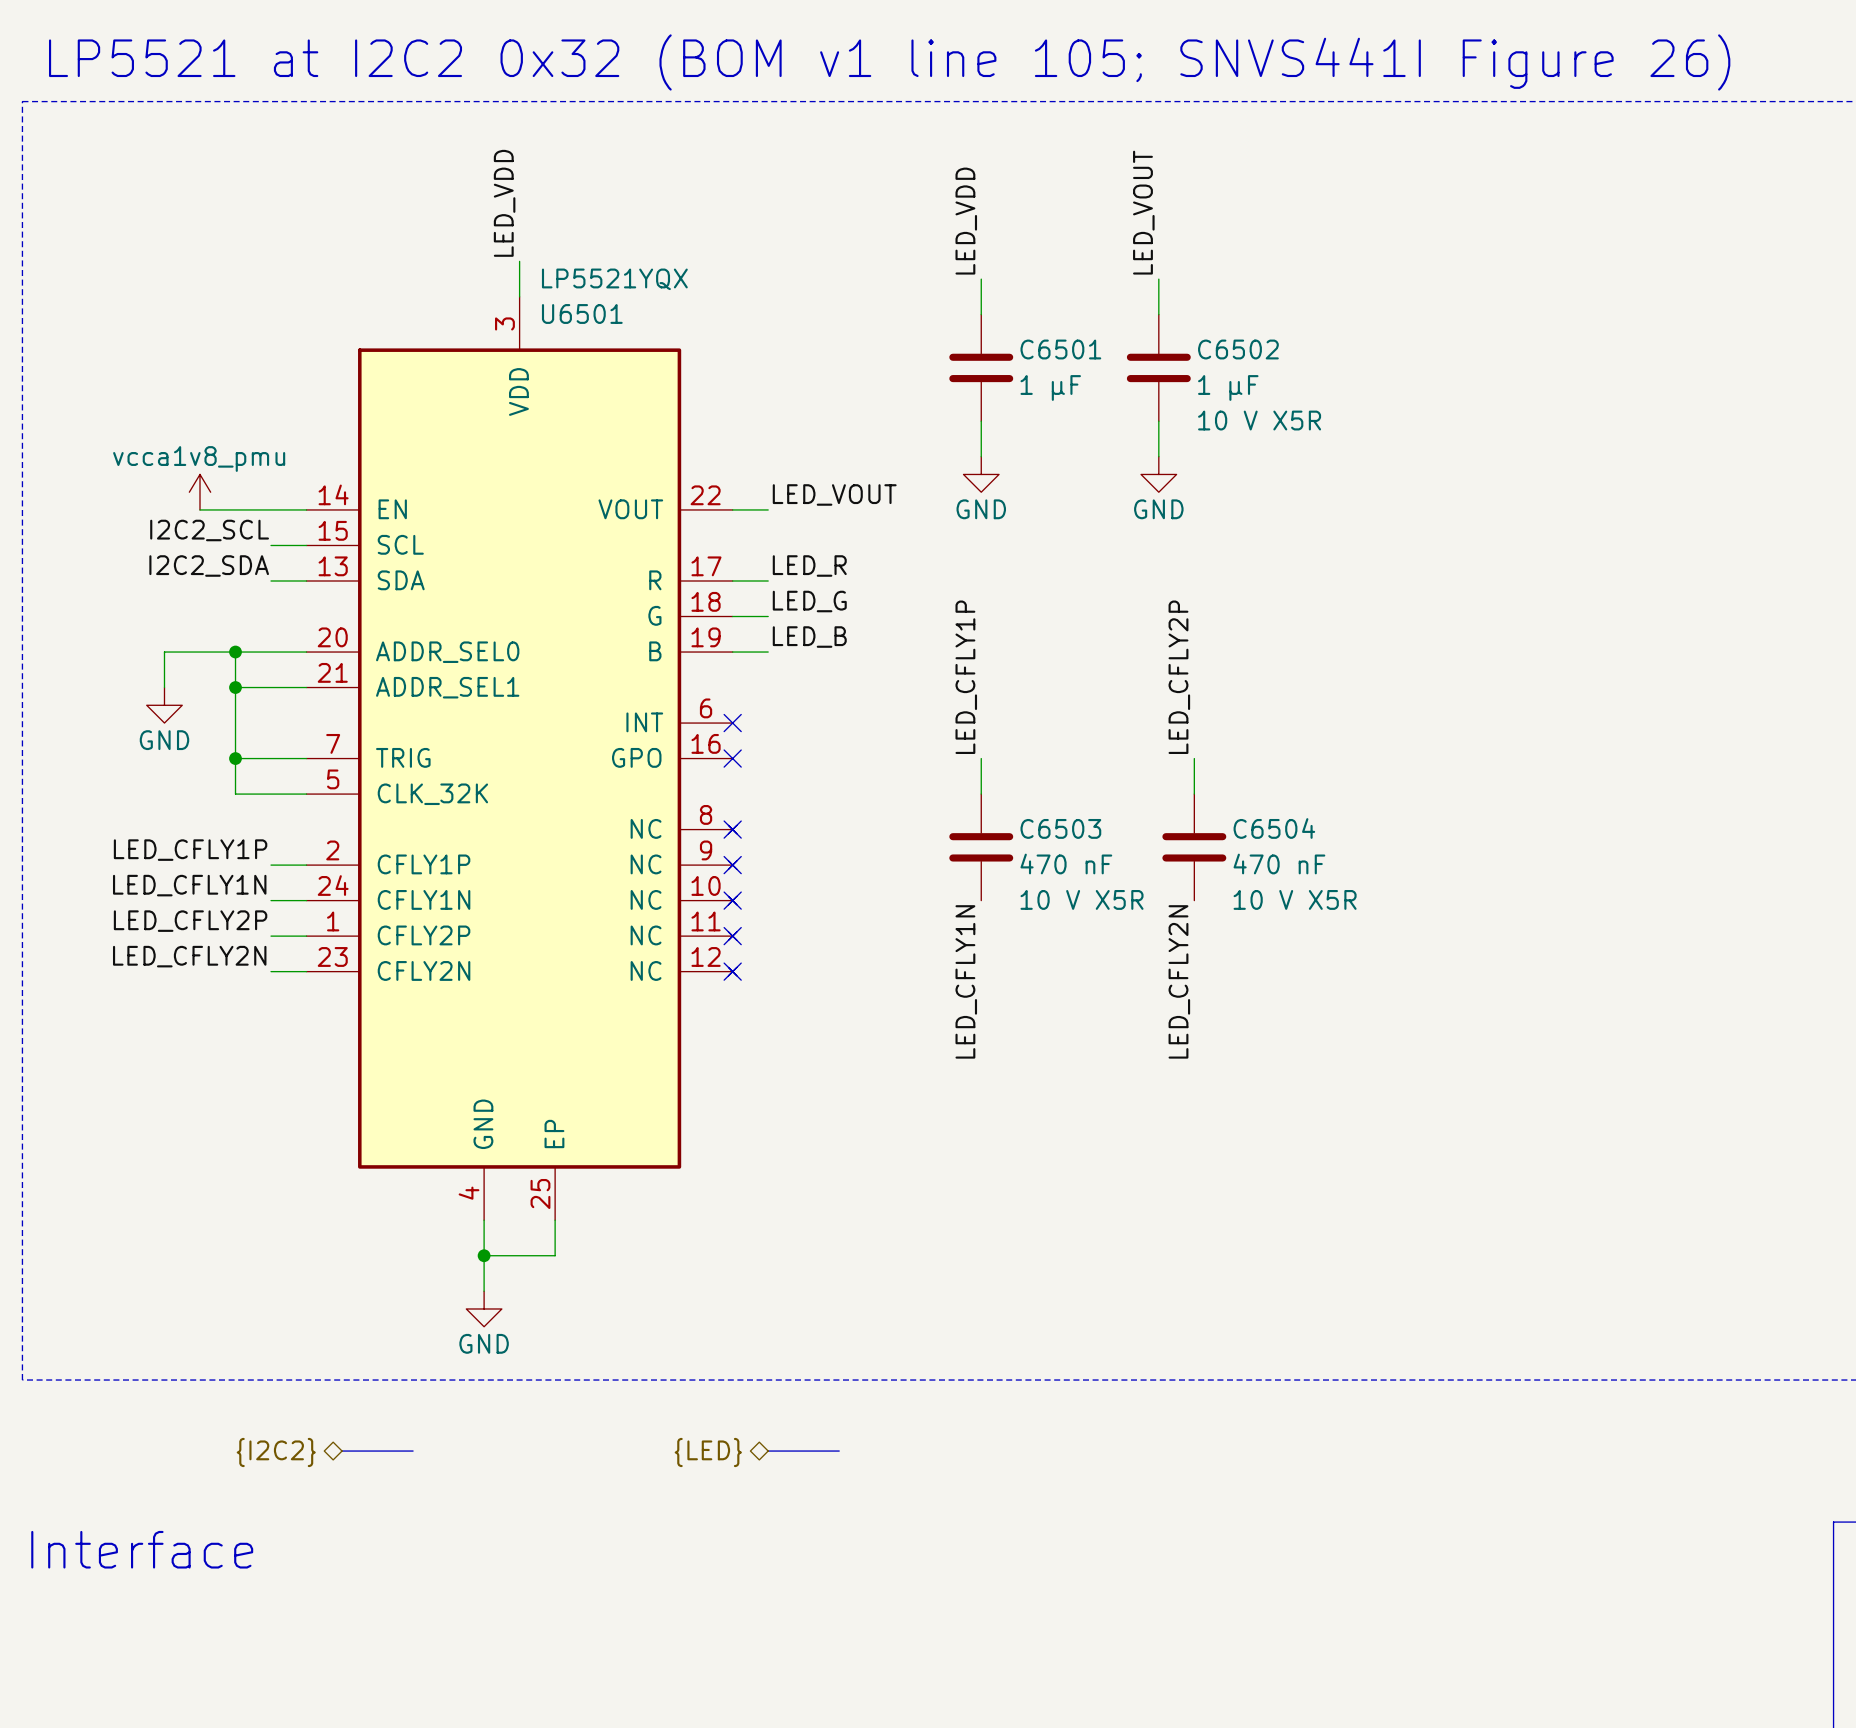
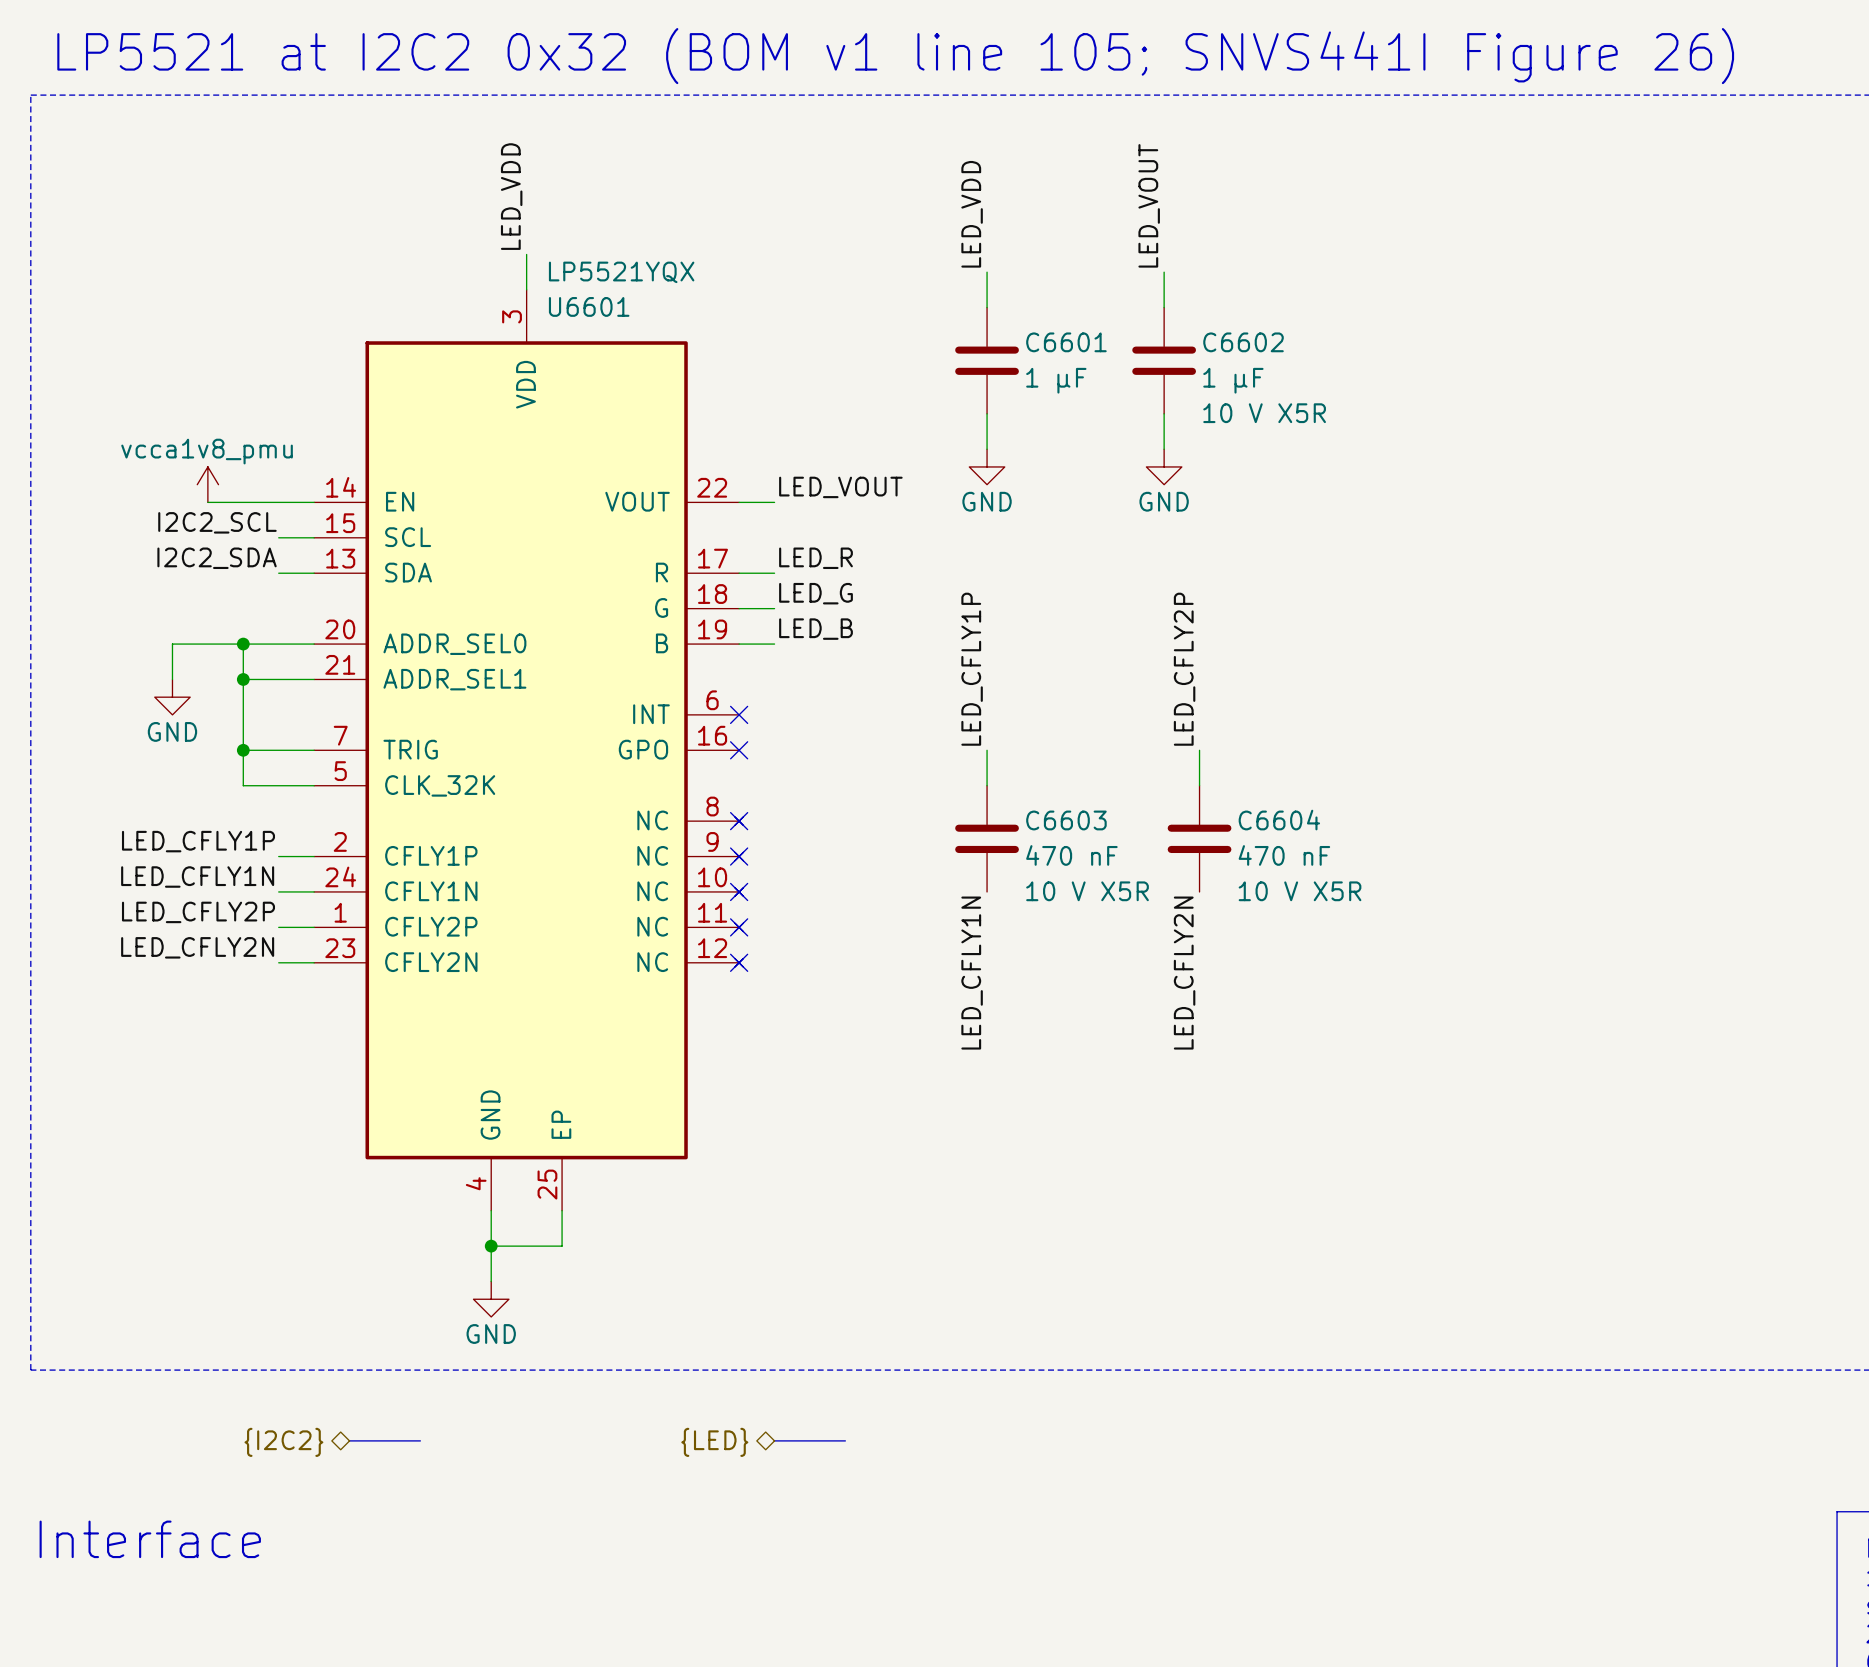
U6501 name: U6501 (582, 313) -> U6601 (589, 306)
C6501 name: C6501 (1060, 349) -> C6601 (1066, 342)
C6502 name: C6502 (1238, 349) -> C6602 (1243, 342)
C6503 name: C6503 (1060, 828) -> C6603 (1066, 820)
C6504 name: C6504 (1274, 828) -> C6604 (1279, 820)

